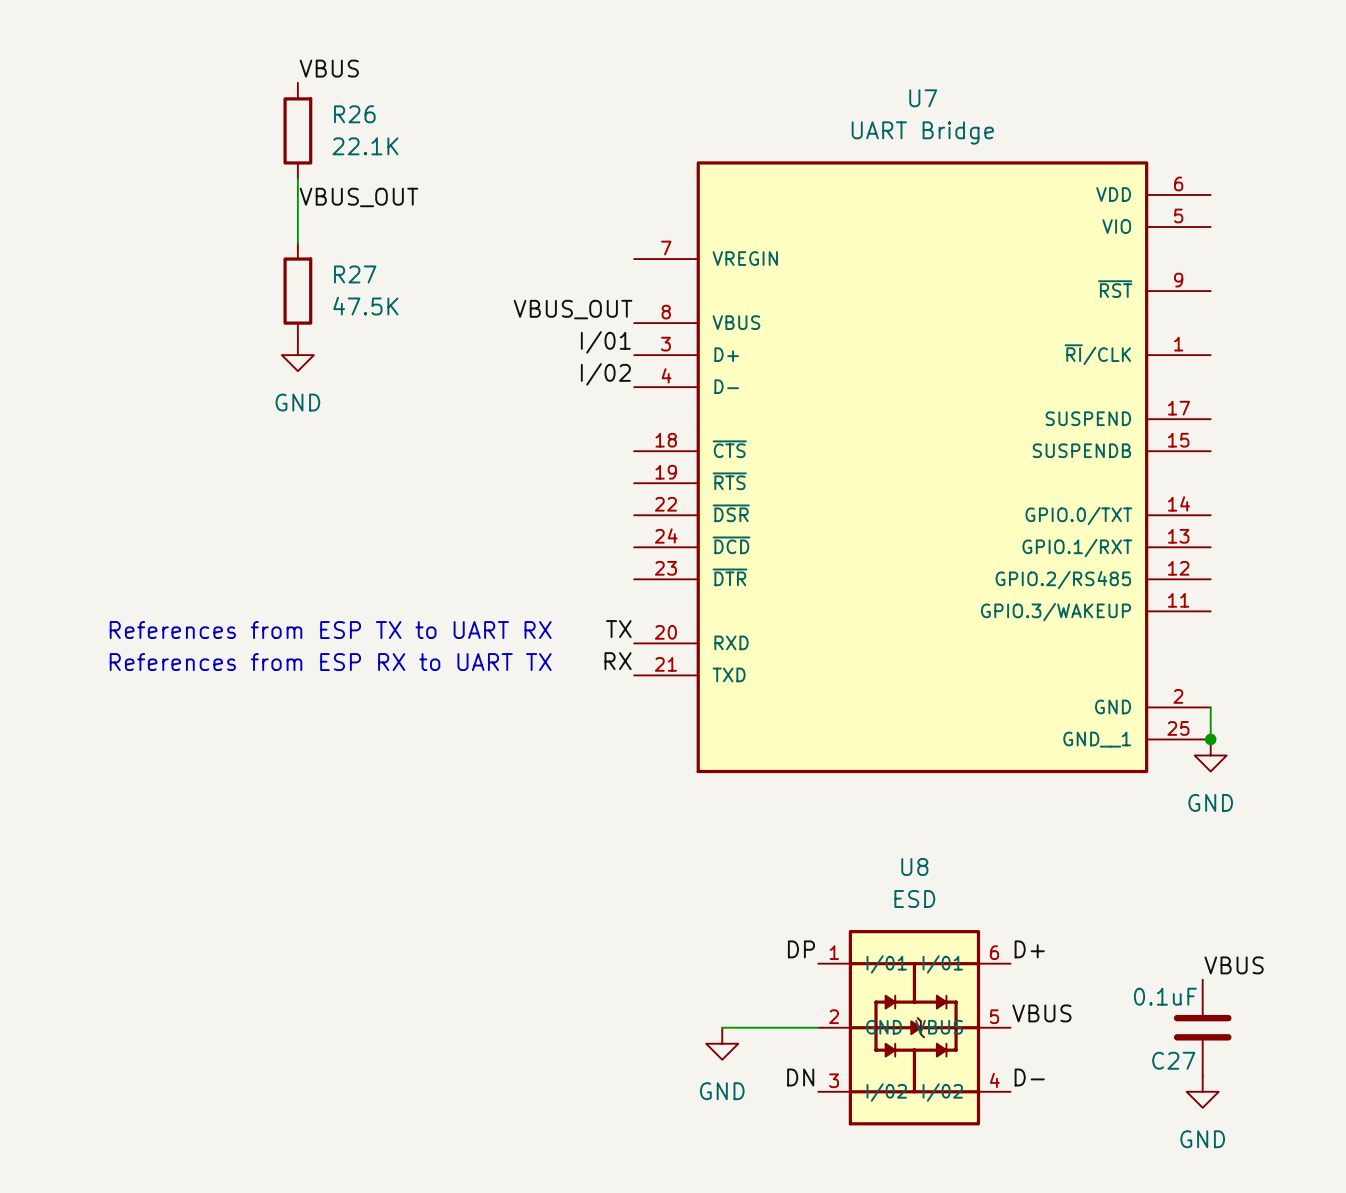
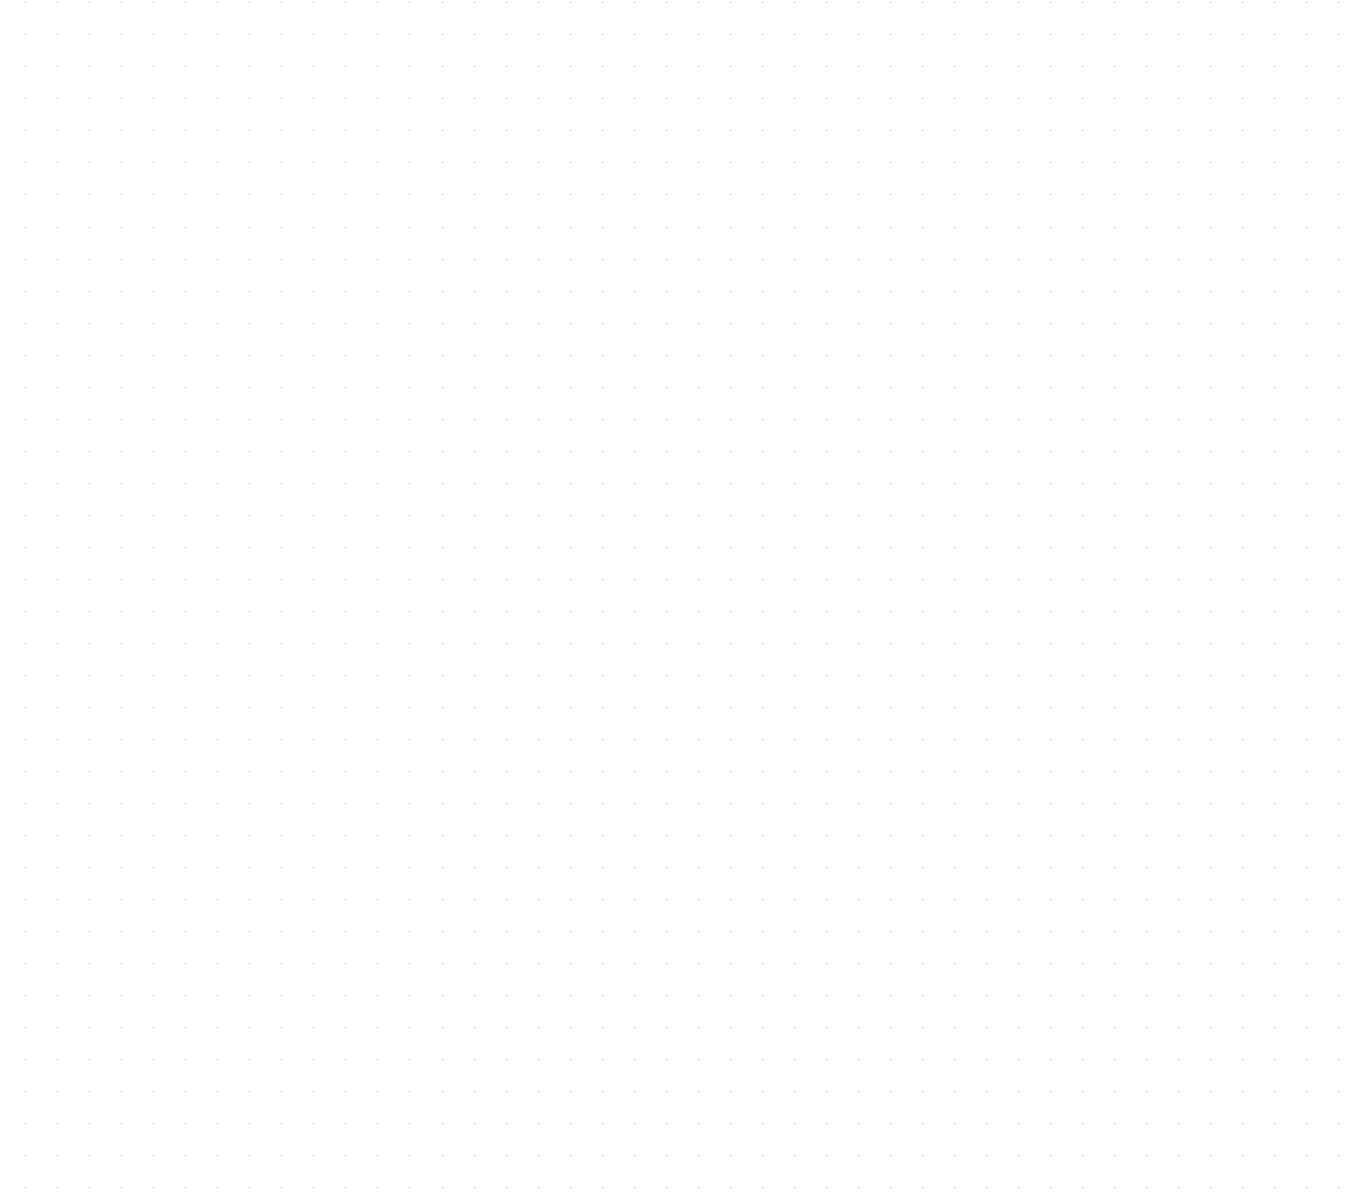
label: VBUS (329, 68) -> none
R26: 22.1K (297, 130) -> none
wire: (297, 178) (297, 243) -> none
label: VBUS_OUT (359, 197) -> none
R27: 47.5K (297, 291) -> none
label: VBUS_OUT (573, 309) -> none
label: I/01 (605, 342) -> none
power symbol: GND (297, 355) -> none
label: I/02 (605, 374) -> none
U7: UART Bridge (922, 467) -> none
label: TX (618, 629) -> none
text: References from ESP TX to UART RX (330, 630) -> none
label: RX (618, 661) -> none
text: References from ESP RX to UART TX (330, 662) -> none
wire: (1210, 707) (1210, 739) -> none
junction: (1210, 739) -> none
power symbol: GND (1210, 755) -> none
label: DP (801, 949) -> none
label: D+ (1029, 949) -> none
label: VBUS (1234, 965) -> none
label: VBUS (1041, 1013) -> none
wire: (722, 1027) (818, 1027) -> none
U8: ESD (914, 1027) -> none
C27: 0.1uF (1202, 1027) -> none
power symbol: GND (722, 1043) -> none
label: DN (800, 1077) -> none
label: D- (1029, 1077) -> none
power symbol: GND (1202, 1091) -> none

